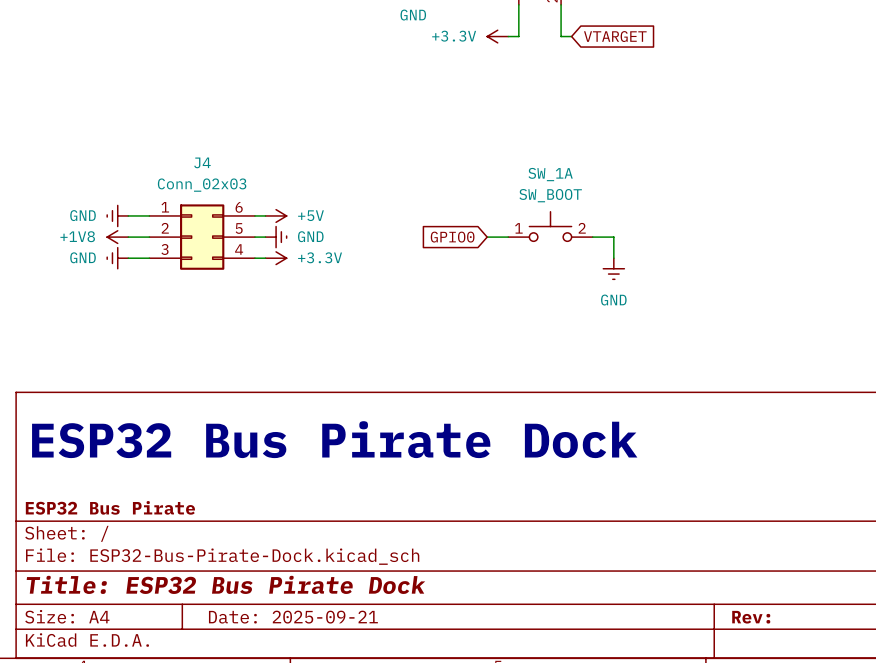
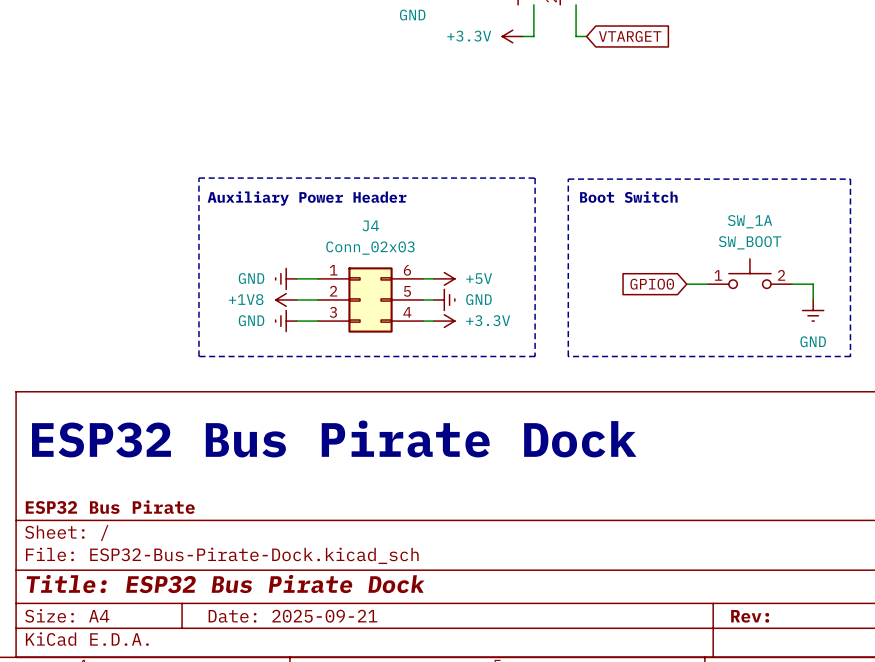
wire: (518, 4) (518, 36) (508, 36) -> (533, 4) (533, 36) (523, 36)
wire: (561, 4) (561, 36) (571, 36) -> (576, 4) (576, 36) (586, 36)
power symbol position: +3.3V (497, 36) -> +3.3V (512, 36)
global label position: VTARGET (615, 36) -> VTARGET (630, 36)
line: none -> (198, 178) (535, 178) (535, 356) (198, 356) (198, 178)
line: none -> (568, 179) (850, 179) (850, 356) (568, 356) (568, 179)
text: none -> Boot Switch (628, 197)
text: none -> Auxiliary Power Header (307, 198)
power symbol: GND (117, 215) -> none
wire: (128, 215) (149, 215) -> (296, 278) (317, 278)
wire: (254, 215) (265, 215) -> (423, 278) (433, 278)
power symbol position: +5V (276, 215) -> +5V (444, 278)
SW_1A position: (550, 226) -> (749, 273)
power symbol position: +1V8 (117, 237) -> +1V8 (286, 299)
wire: (128, 237) (149, 237) -> (296, 299) (317, 299)
J4 position: (202, 237) -> (370, 299)
wire: (254, 237) (265, 237) -> (423, 299) (433, 299)
power symbol: GND (276, 237) -> none
global label position: GPIO0 (452, 237) -> GPIO0 (652, 284)
wire: (487, 237) (508, 237) -> (686, 284) (707, 284)
wire: (592, 237) (613, 237) (613, 258) -> none
power symbol: GND (117, 258) -> none
wire: (128, 258) (149, 258) -> (296, 321) (317, 321)
wire: (254, 258) (265, 258) -> (423, 321) (433, 321)
power symbol: +3.3V (276, 258) -> none
power symbol: GND (613, 268) -> none
power symbol: none -> GND (286, 278)
wire: none -> (792, 284) (813, 284) (813, 299)
power symbol: none -> GND (444, 299)
power symbol: none -> GND (813, 310)
power symbol: none -> GND (286, 321)
power symbol: none -> +3.3V (444, 321)

